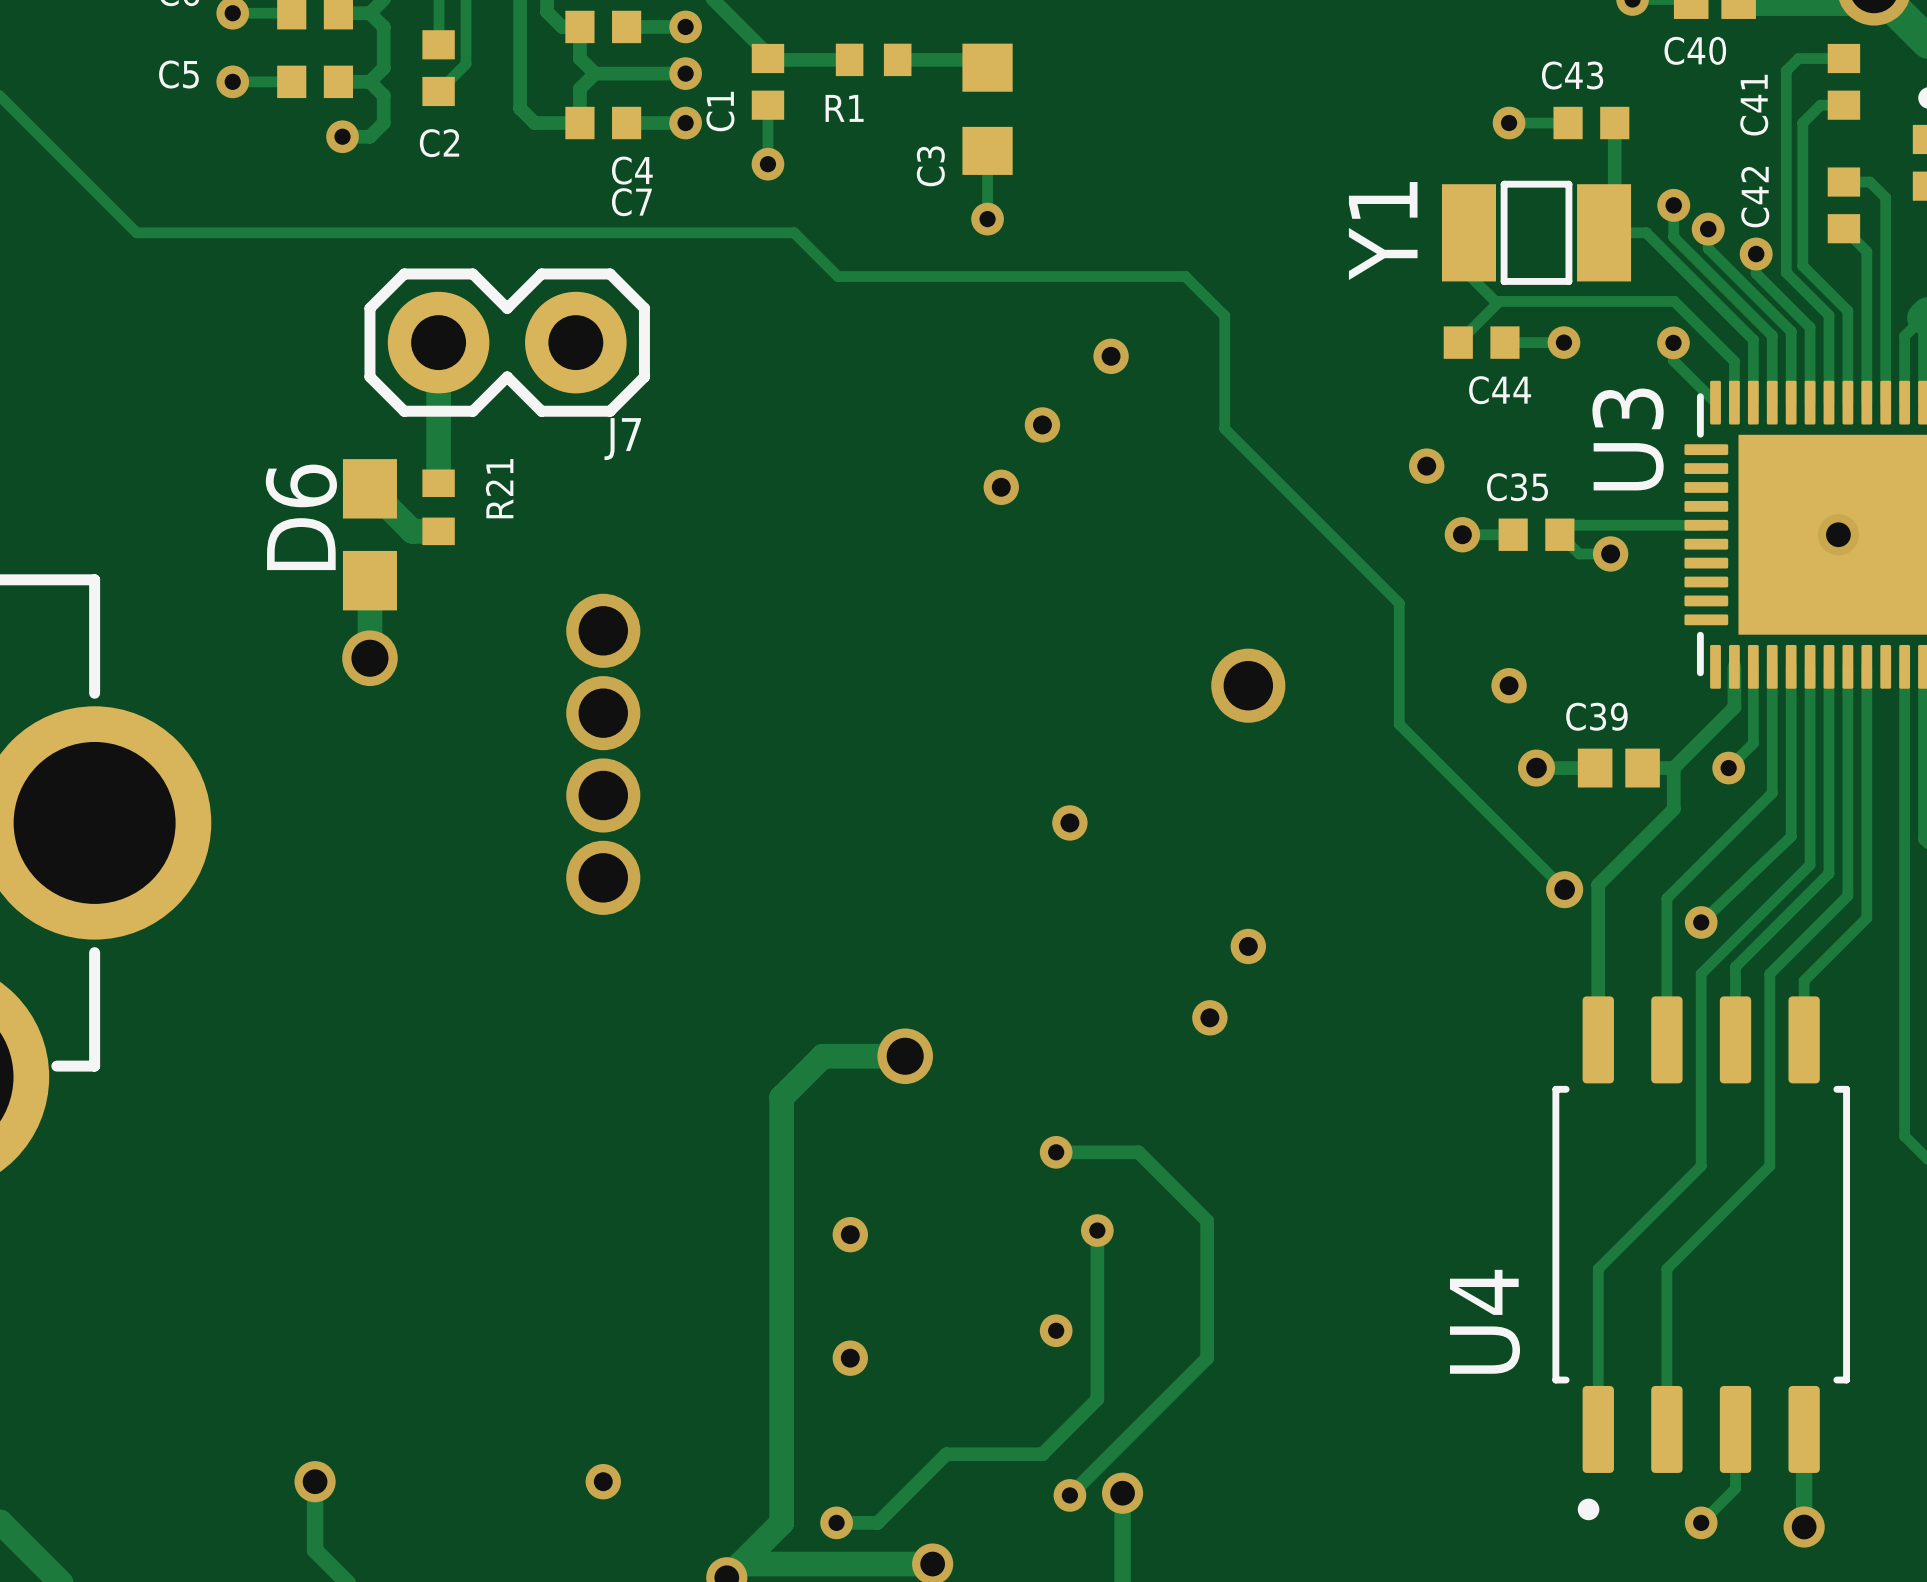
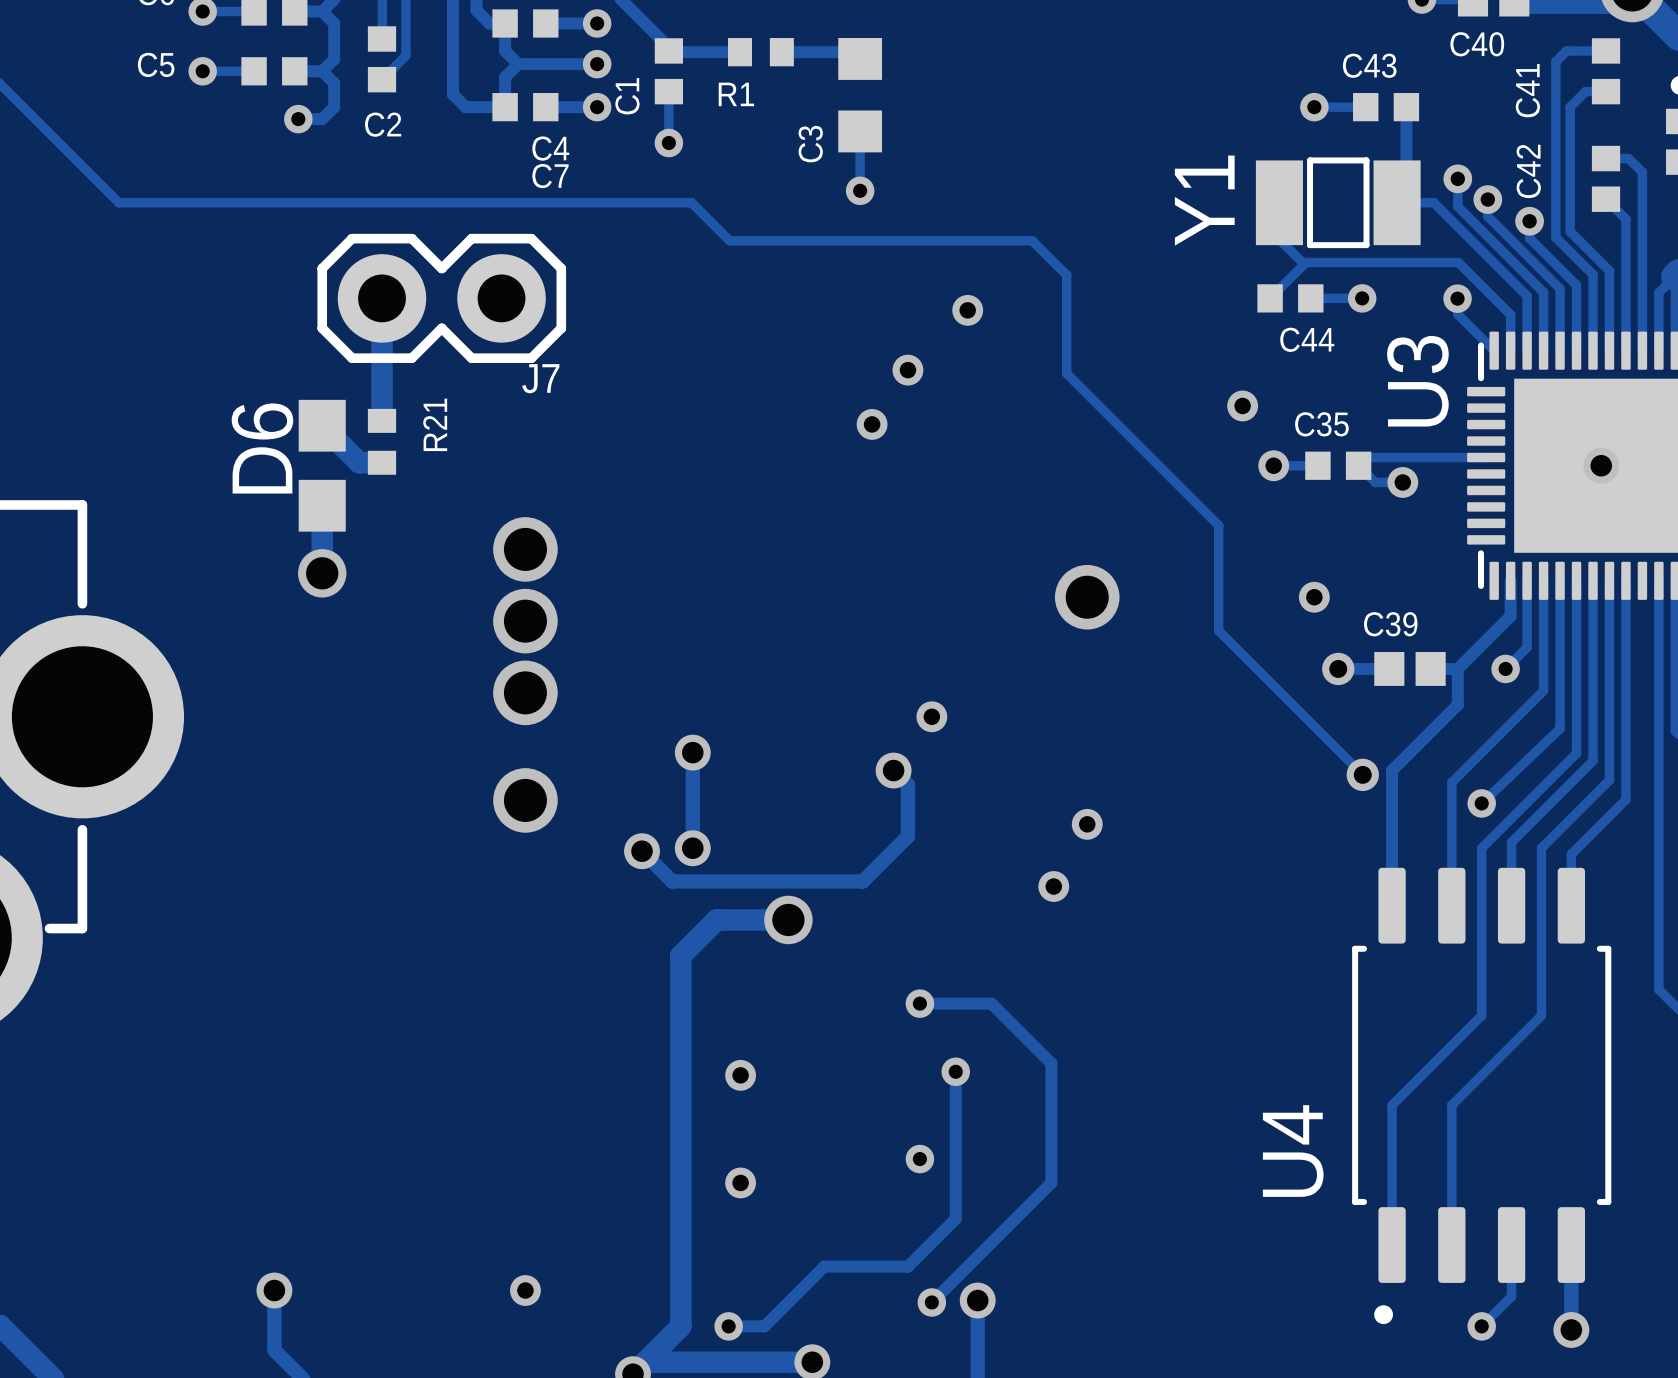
track: none -> (692, 752) (692, 848)
via: none -> (692, 752)
via position: (603, 877) -> (525, 800)
track: none -> (893, 770) (907, 784) (907, 836) (862, 881) (672, 881) (642, 851)
via: none -> (893, 770)
via: none -> (692, 848)
via: none -> (642, 851)

